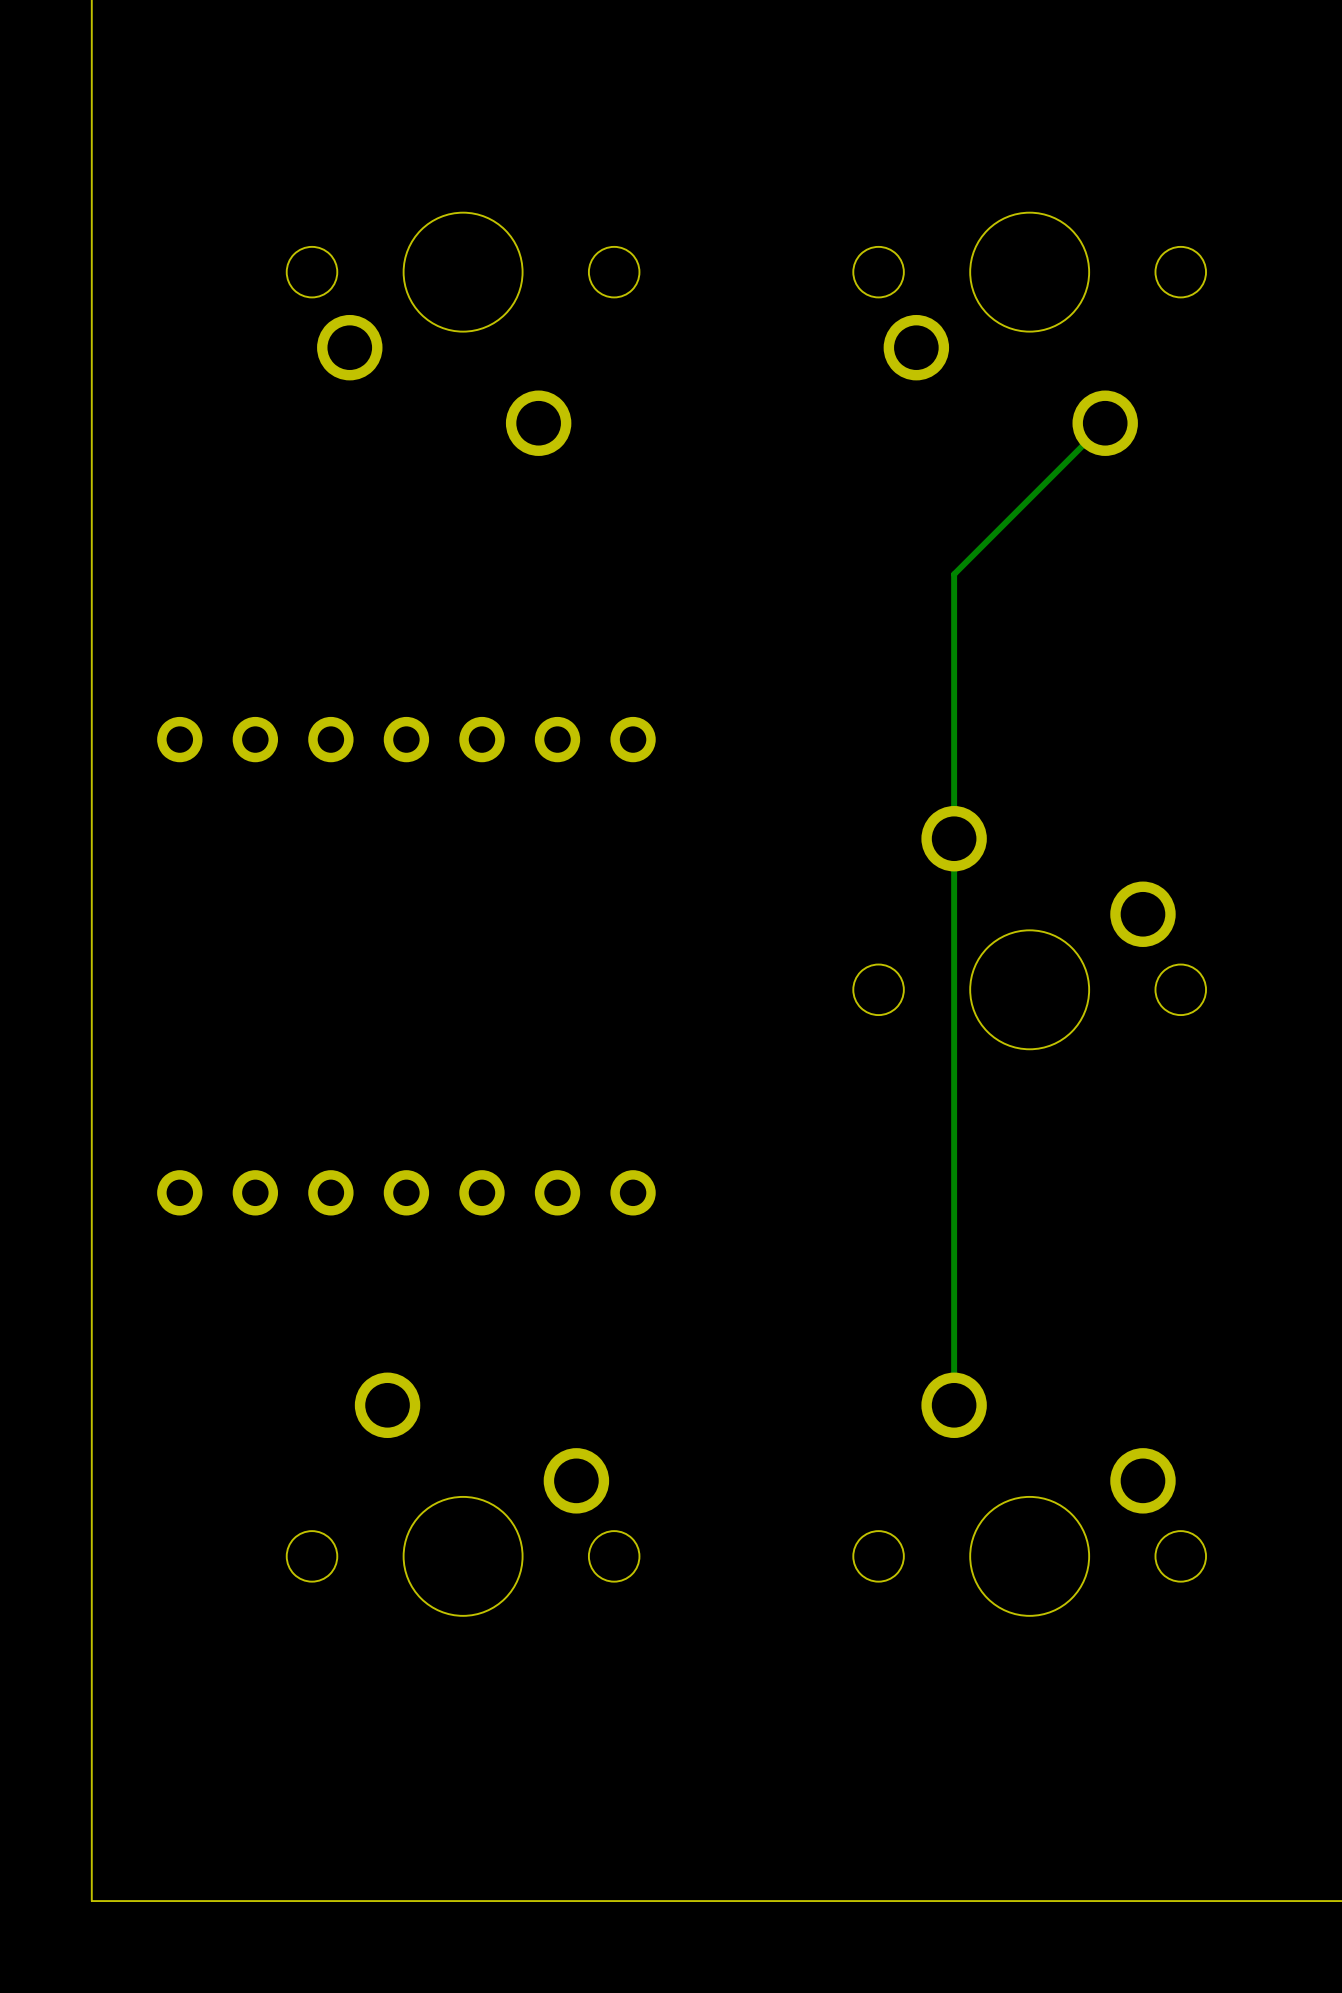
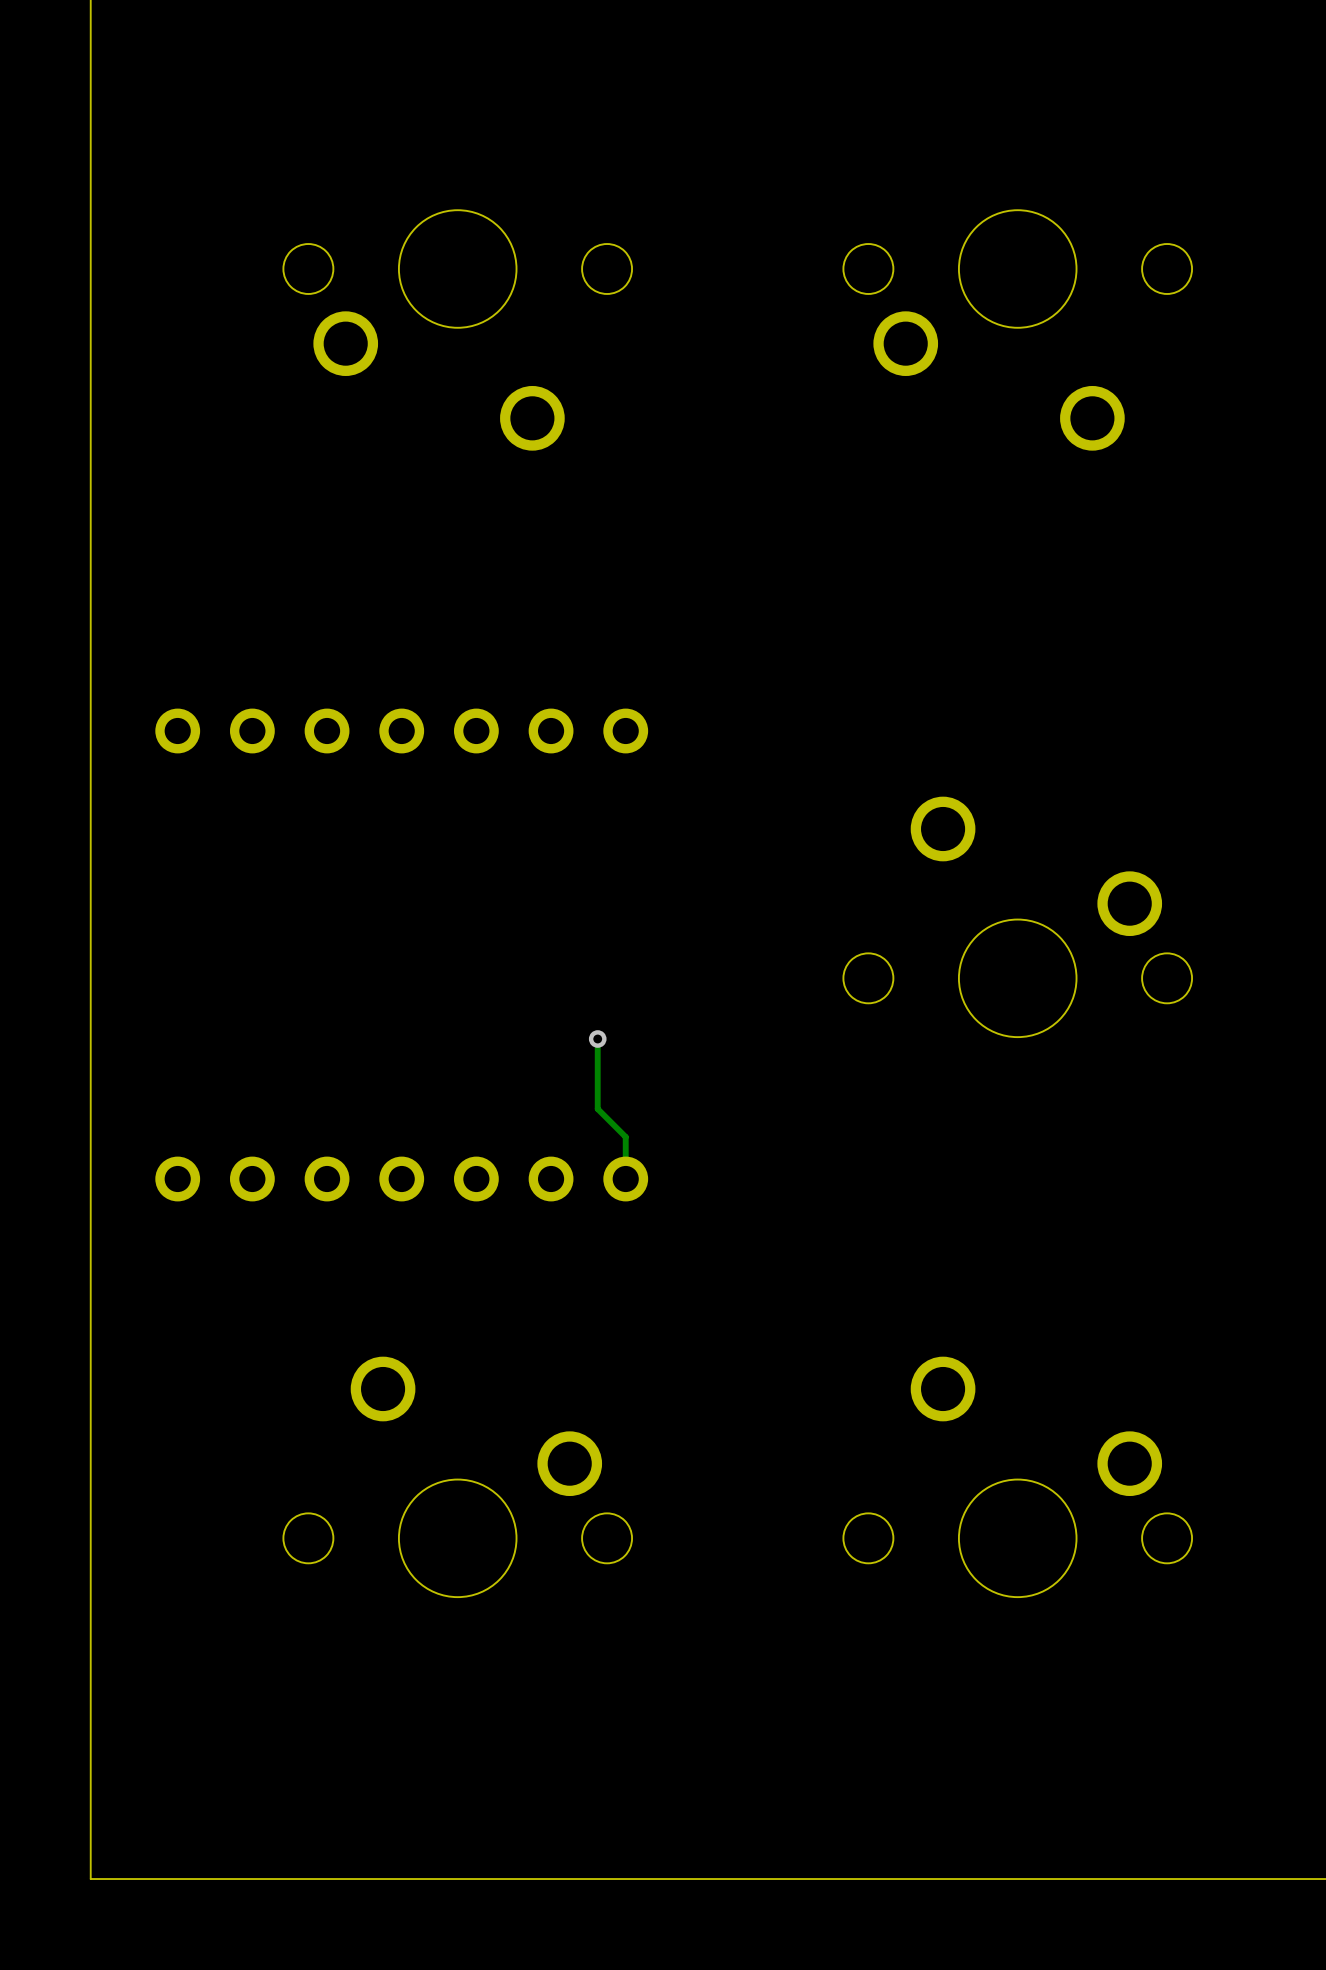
track: (1105, 423) (954, 574) (954, 1405) -> none
track: none -> (597, 1039) (597, 1109) (625, 1137) (625, 1179)
via: none -> (597, 1039)

